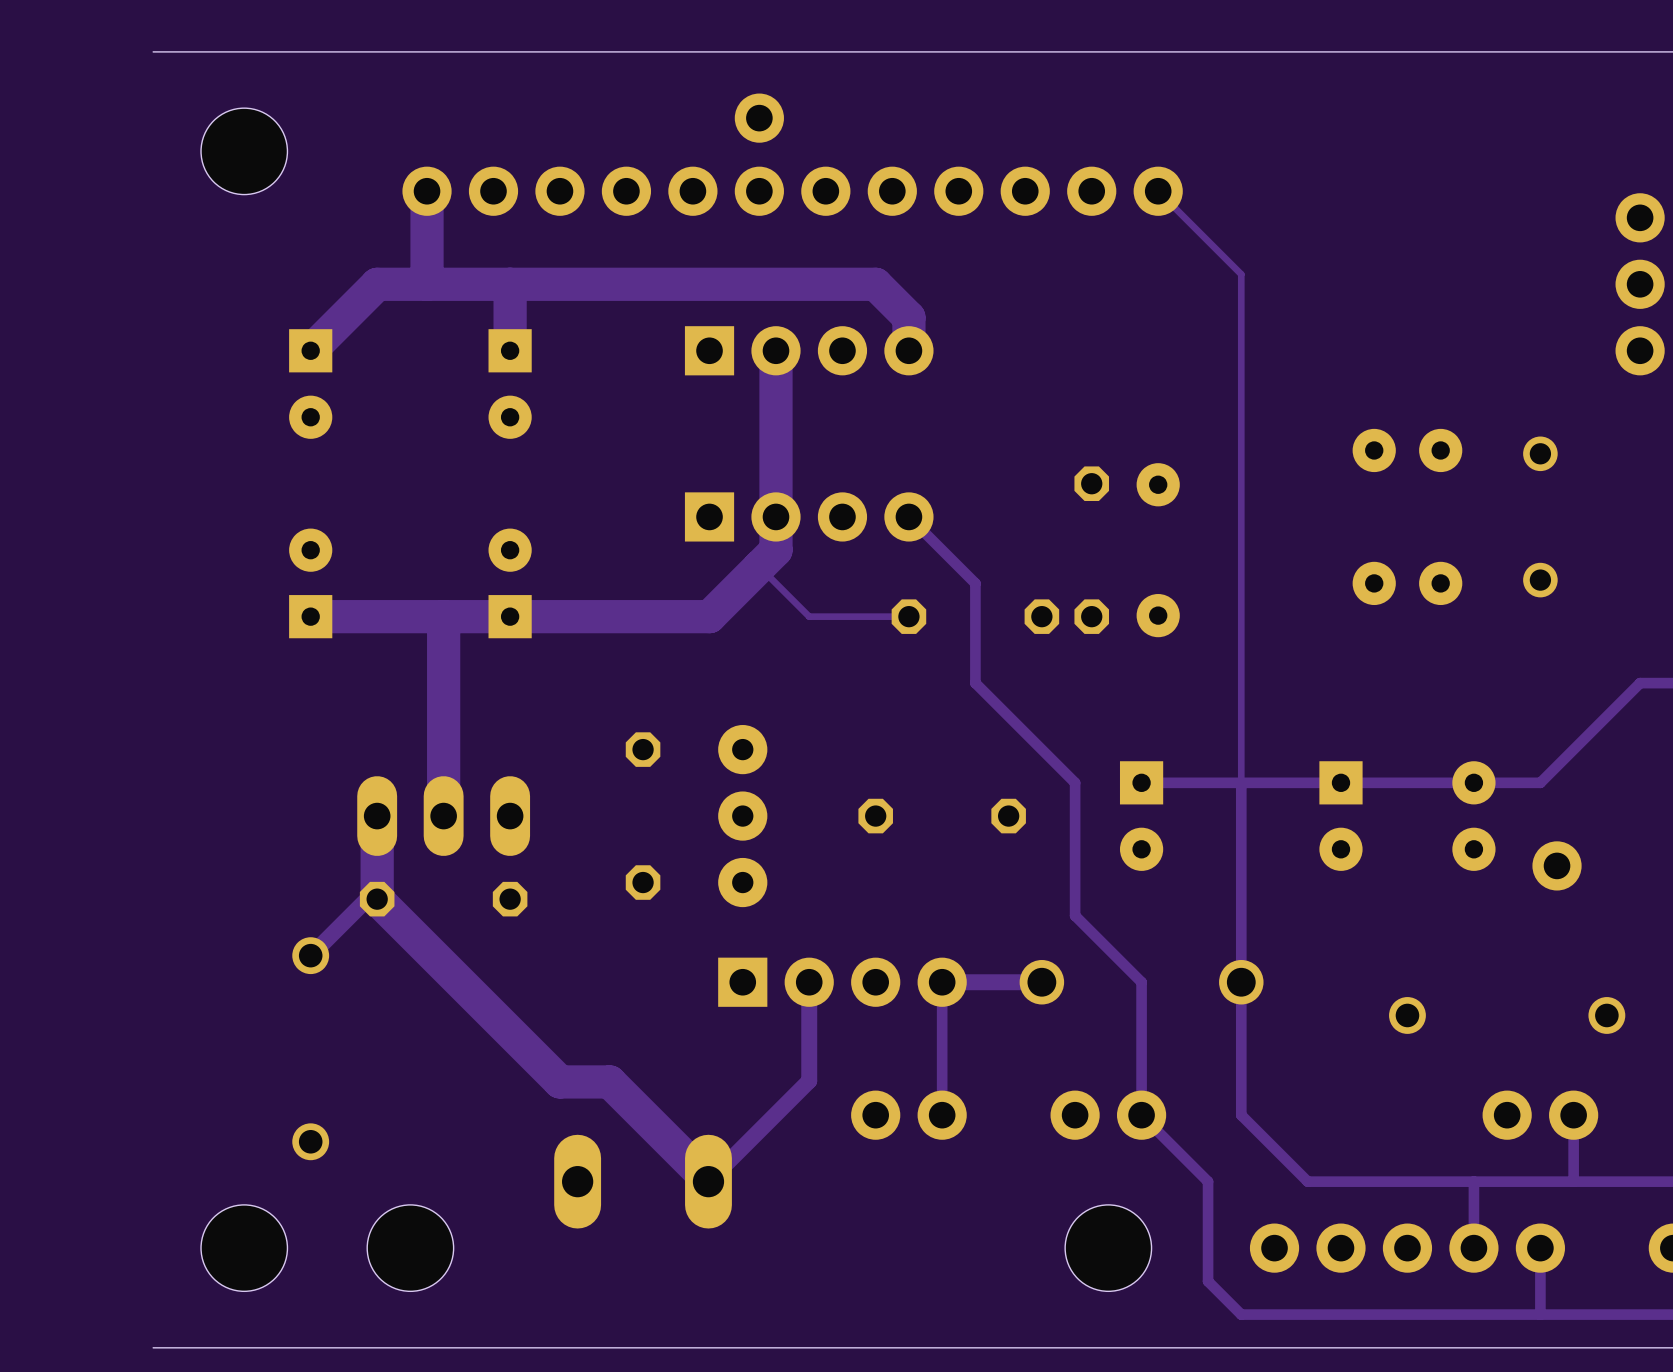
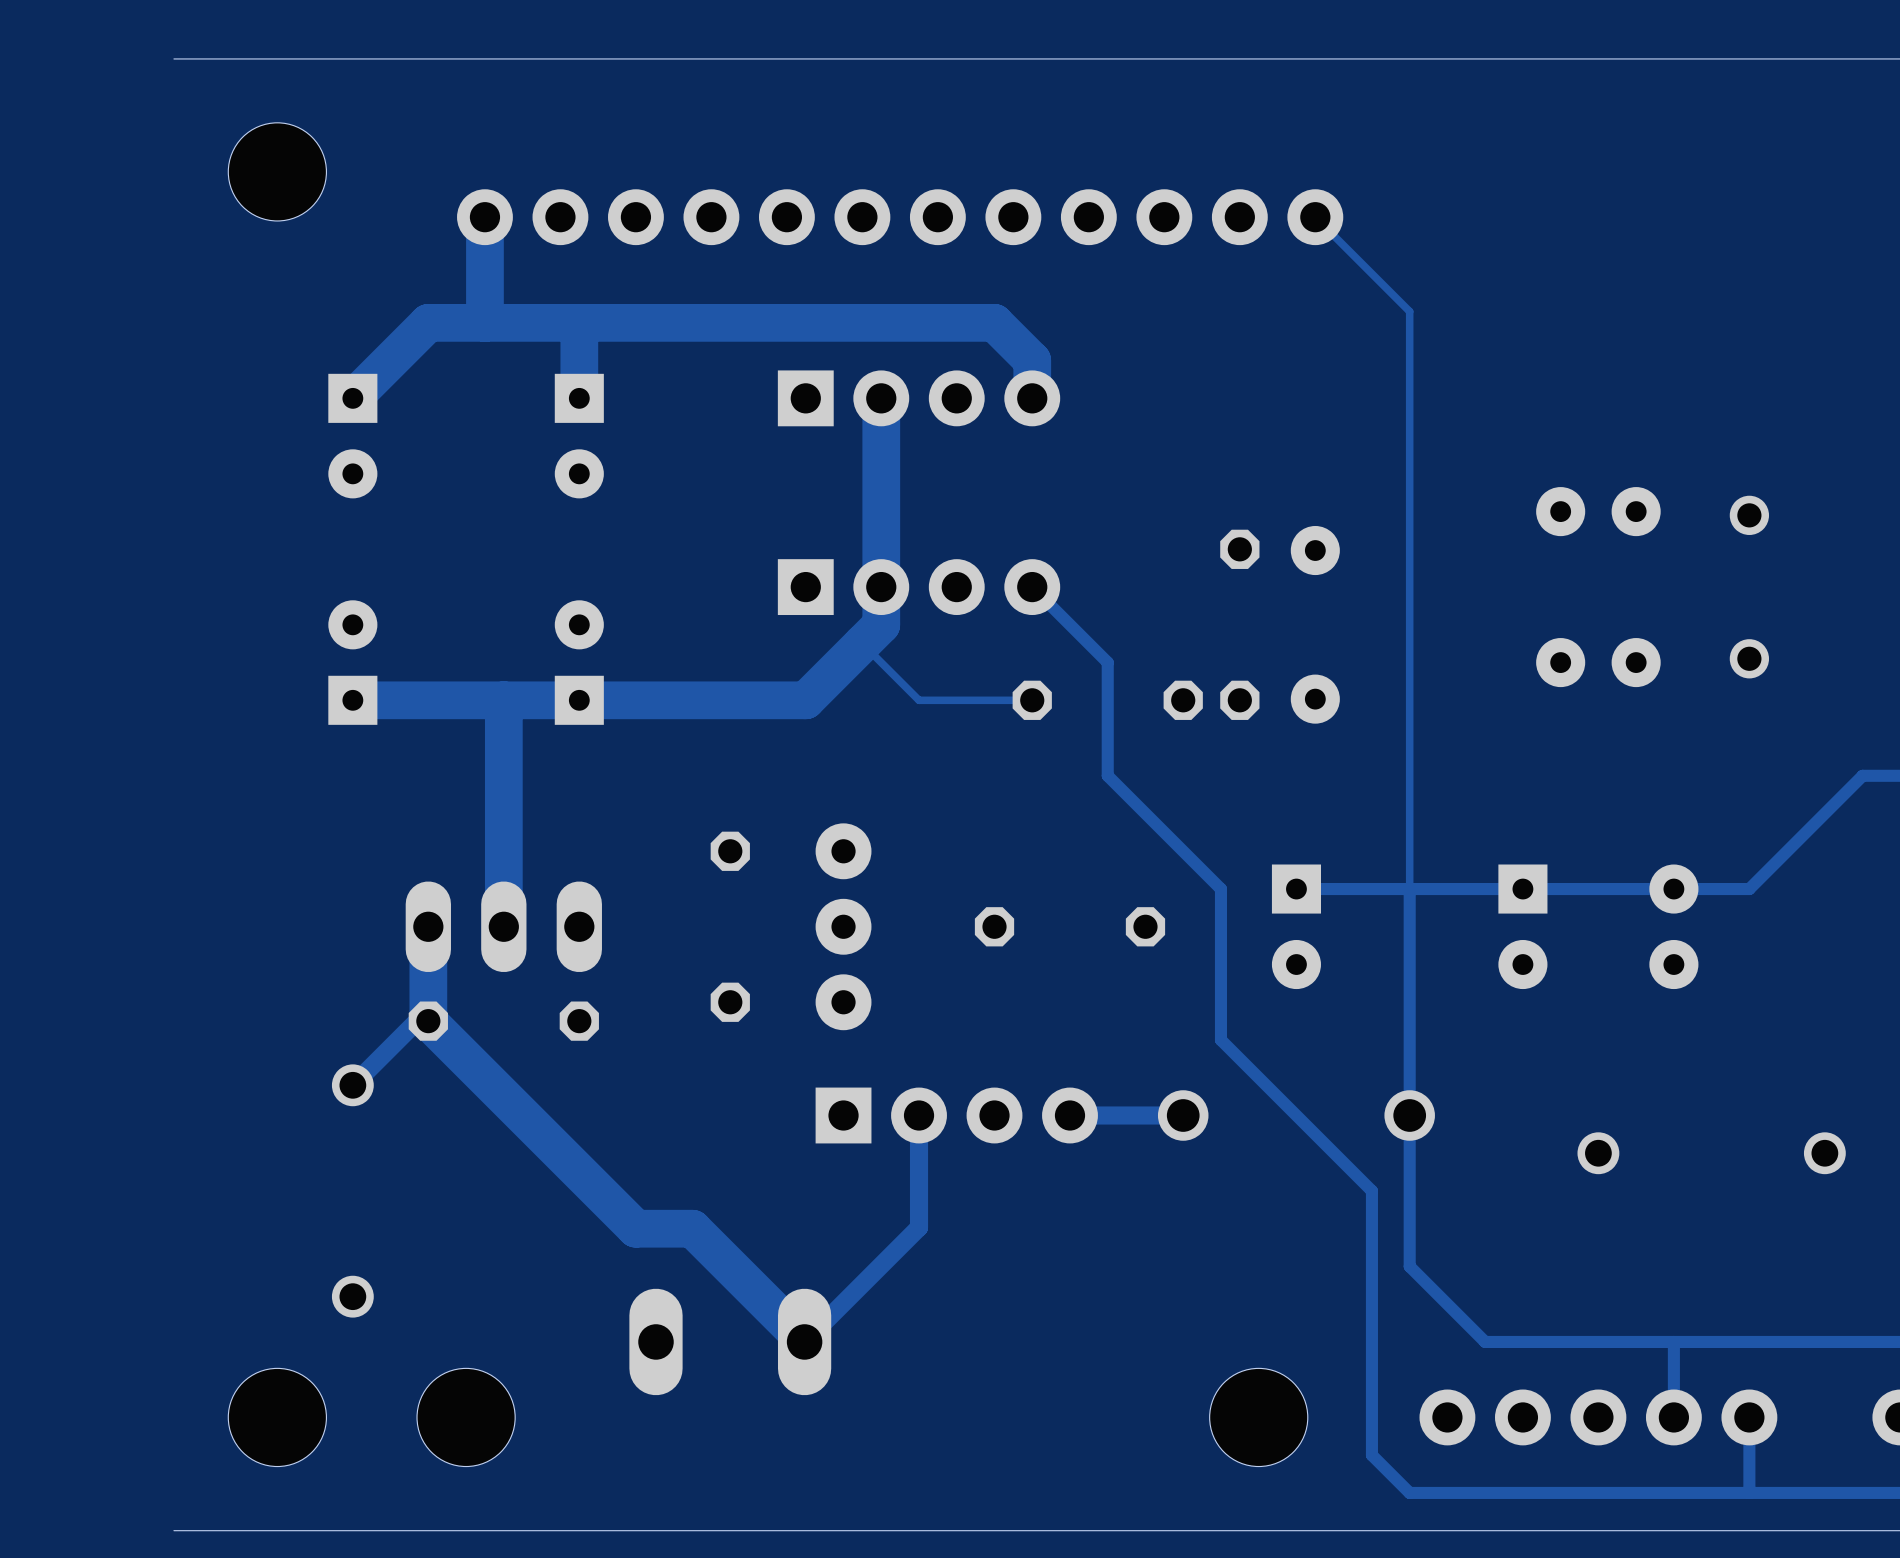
part: (759, 118) -> none
part: (1640, 284) -> none
part: (1557, 865) -> none
track: (942, 982) (942, 1115) -> none
track: (1141, 982) (1141, 1115) (1208, 1181) -> (1296, 1115) (1371, 1190) (1371, 1341)
part: (908, 1115) -> none
part: (1108, 1115) -> none
part: (1540, 1115) -> none
track: (1573, 1115) (1573, 1181) -> none

